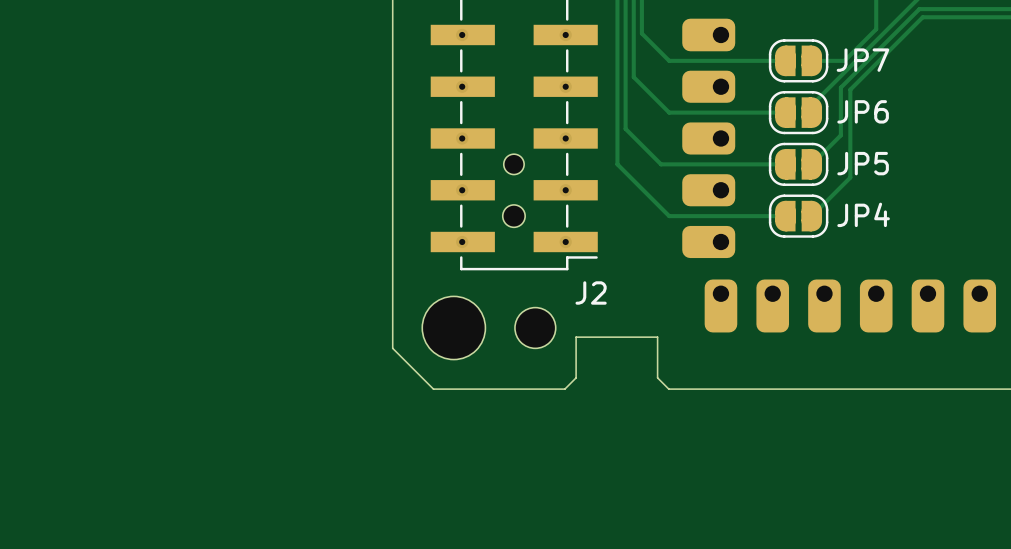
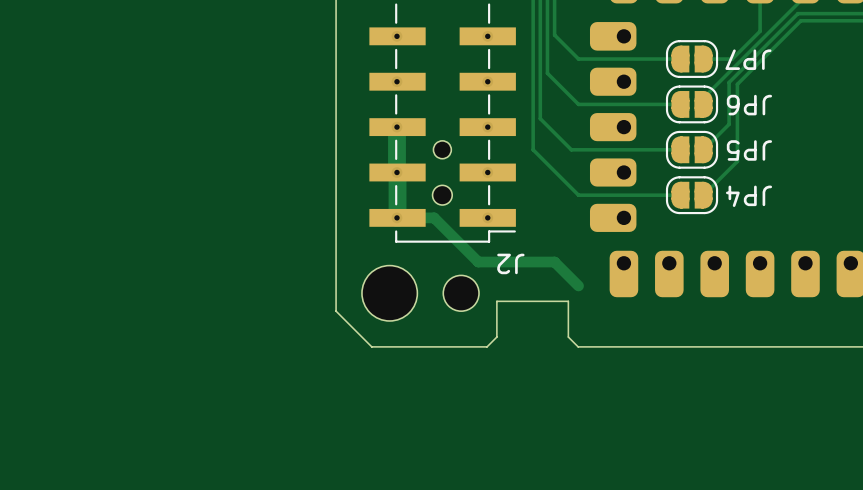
JP7 name rotation: 0° (862, 60) -> 180° (748, 59)
JP6 name rotation: 0° (863, 111) -> 180° (749, 105)
track: none -> (396, 127) (397, 217) (434, 217) (478, 262) (554, 262) (578, 285)
JP5 name rotation: 0° (863, 163) -> 180° (749, 150)
JP4 name rotation: 0° (863, 214) -> 180° (749, 196)
J2 name rotation: 0° (591, 292) -> 180° (510, 263)

